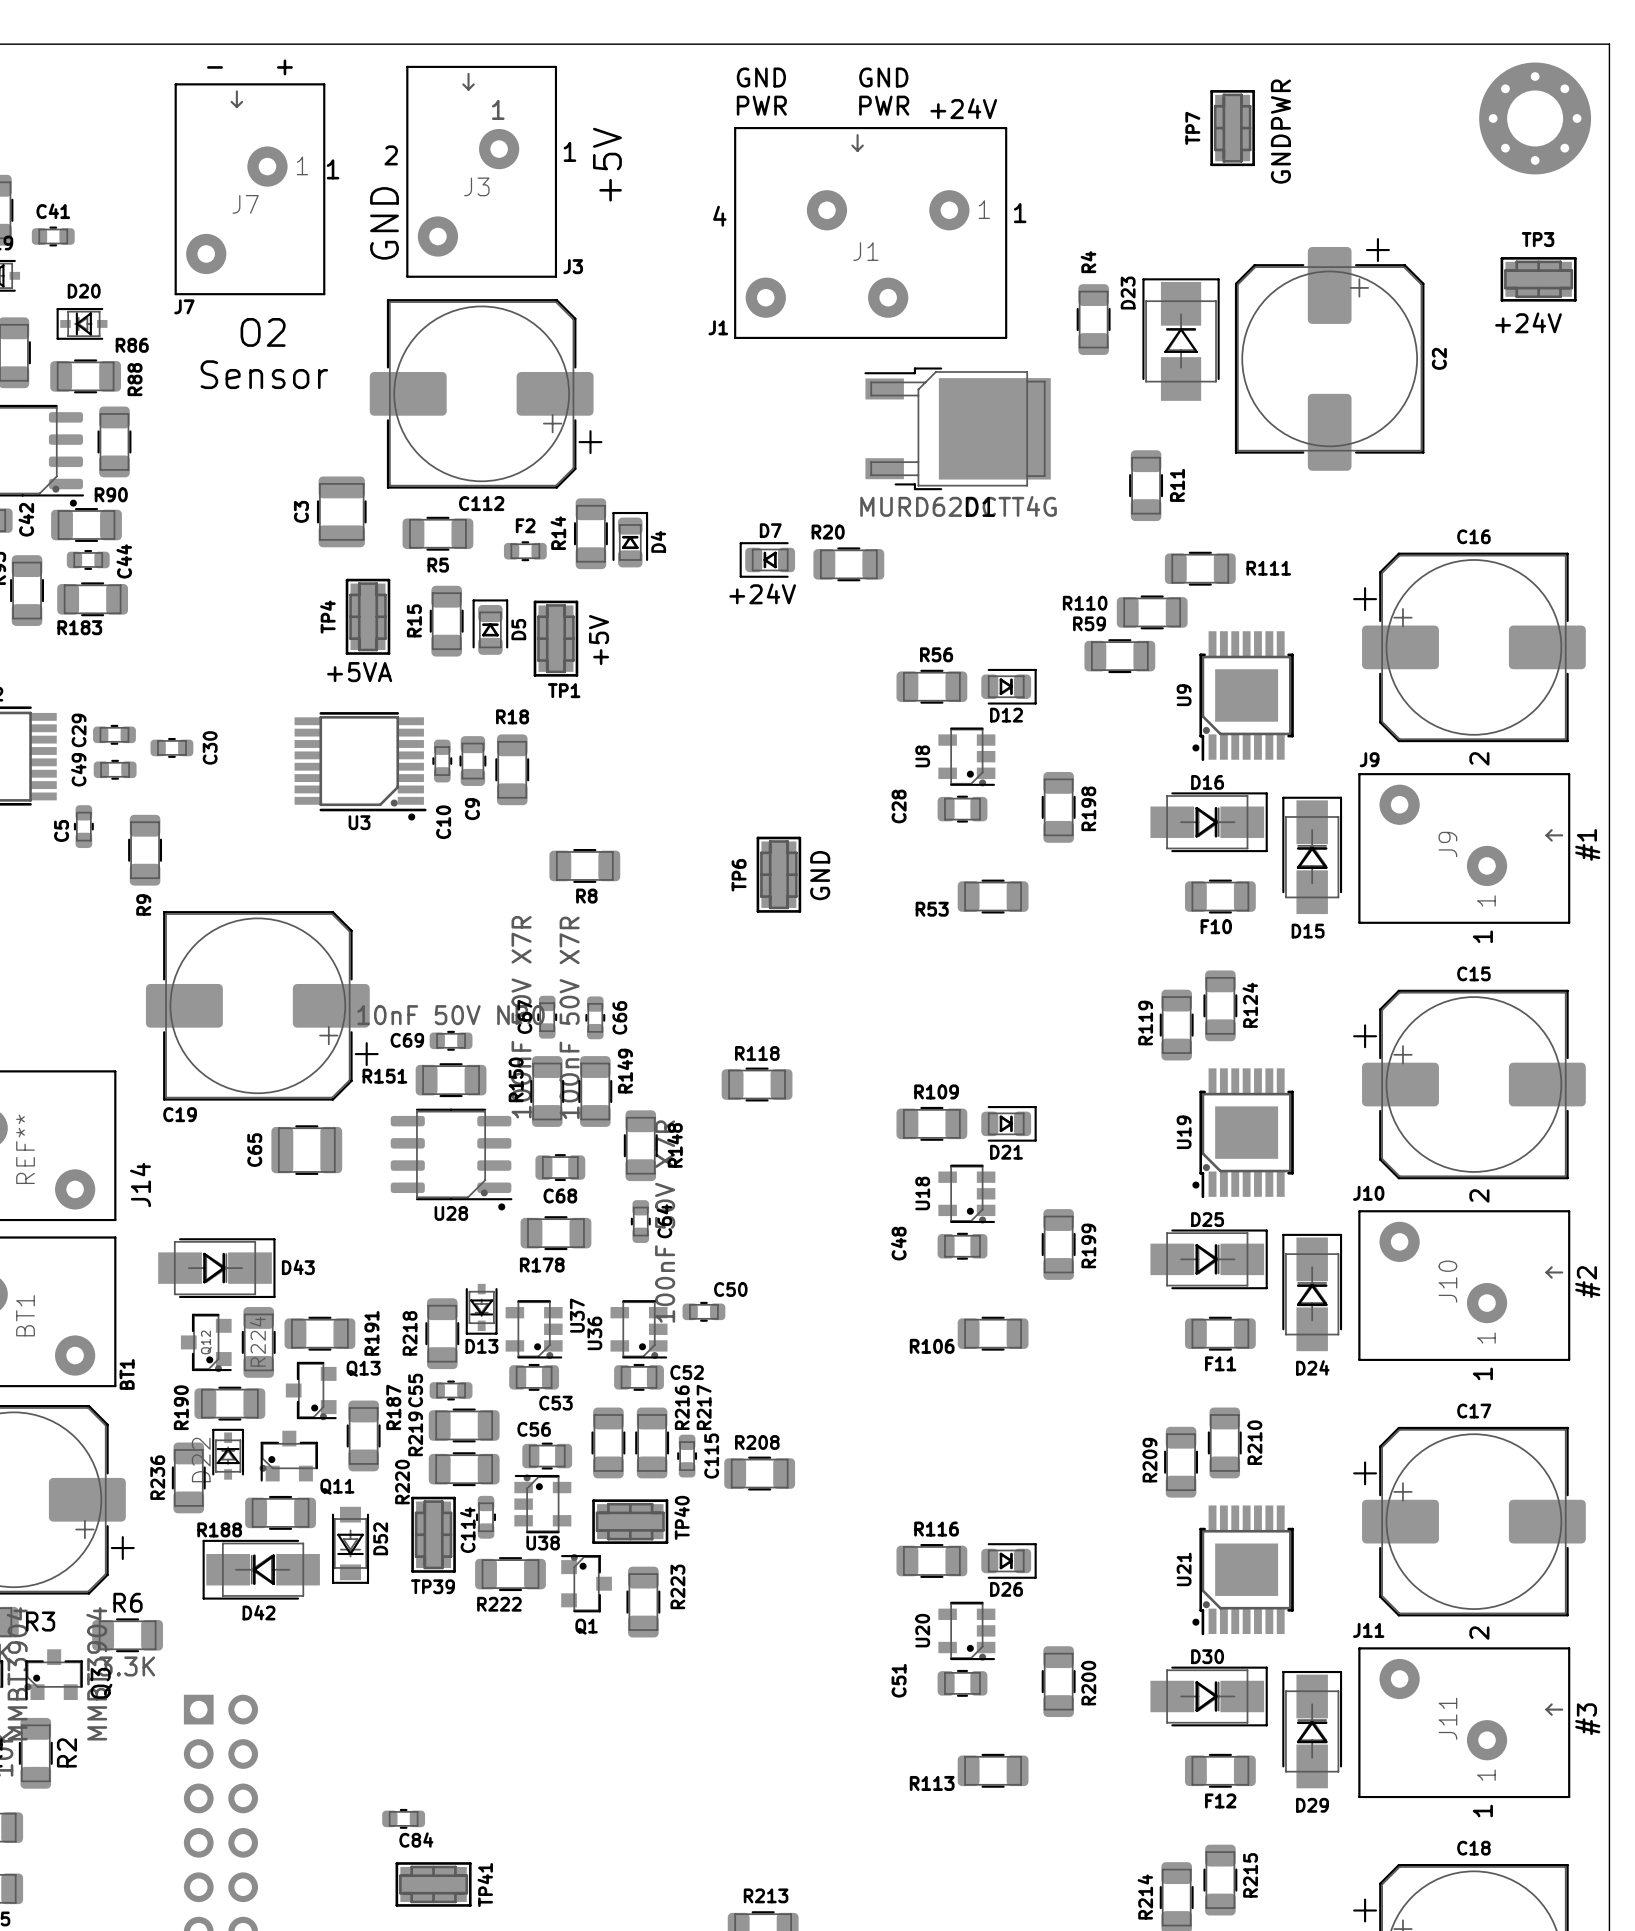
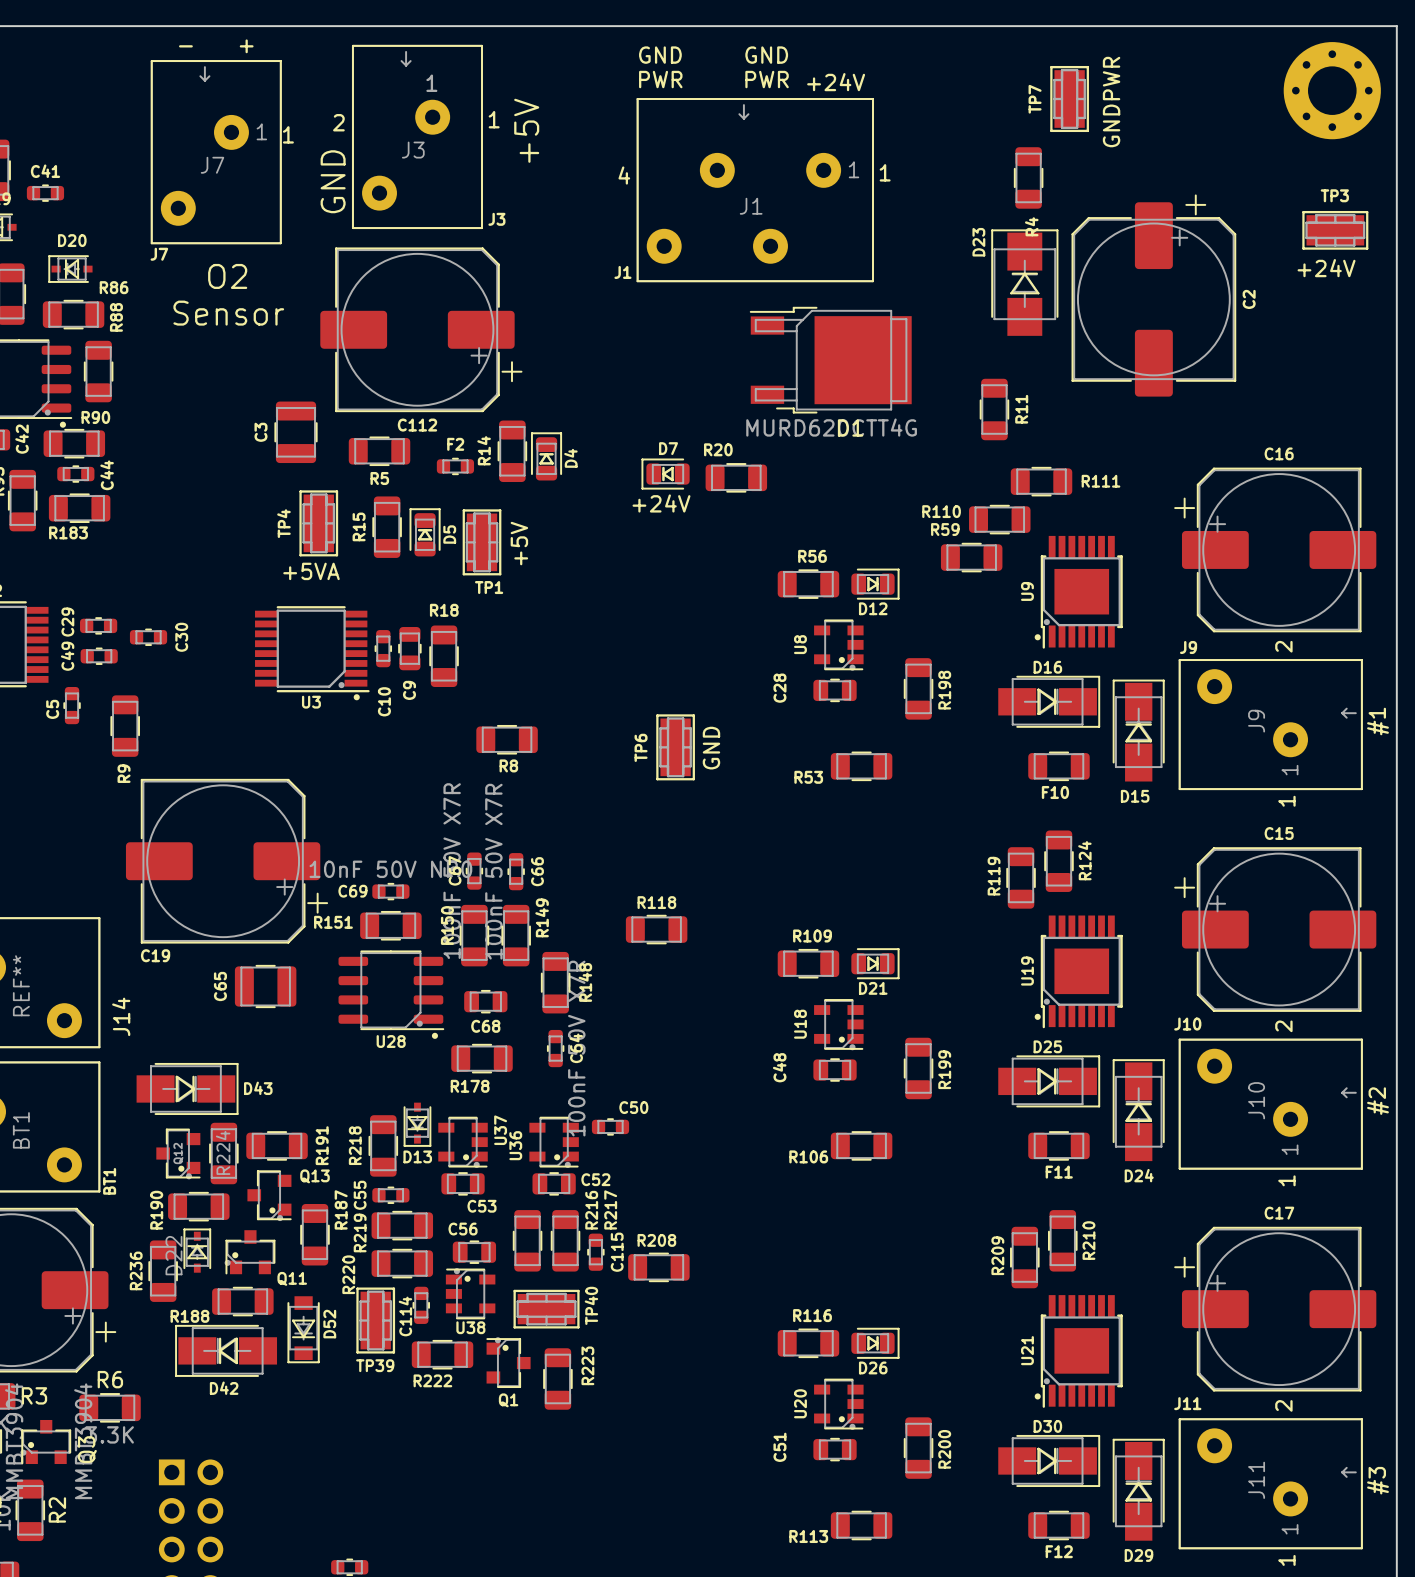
R4 name position: R4 (1088, 262) -> R4 (1031, 226)
R4 position: (1093, 319) -> (1028, 177)

